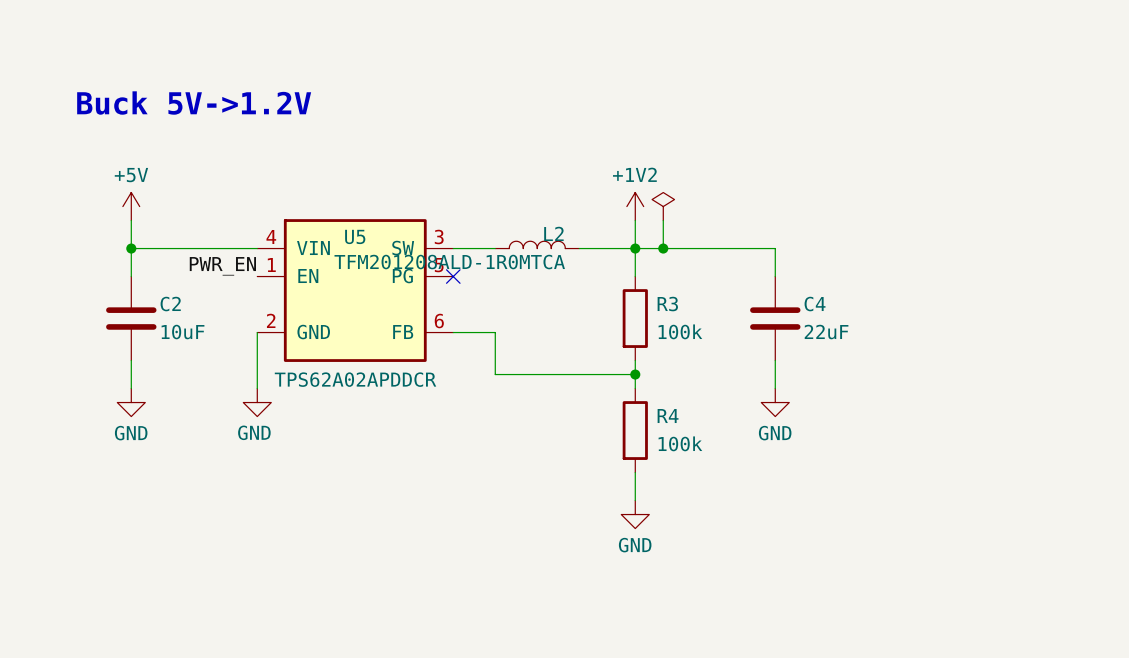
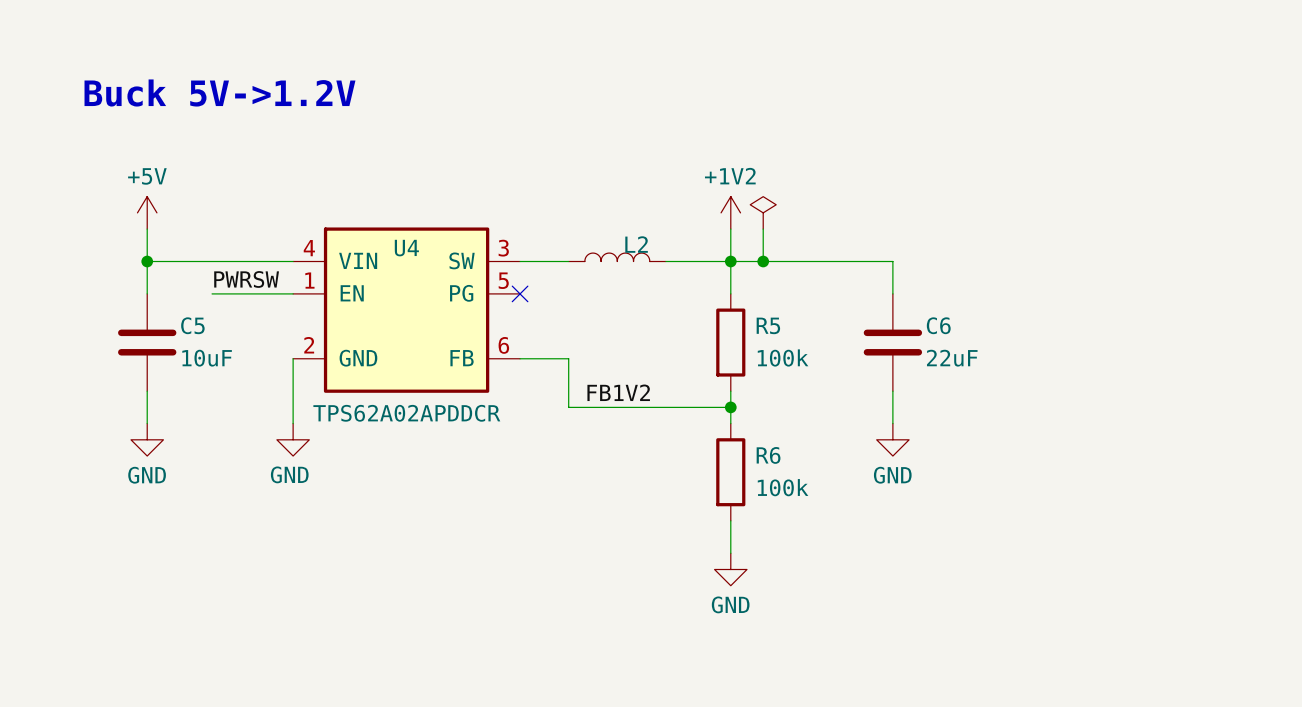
U5 name: U5 (355, 236) -> U4 (406, 248)
L2 value: TFM201208ALD-1R0MTCA (449, 262) -> none
label: none -> PWRSW (246, 279)
label: PWR_EN (222, 266) -> none
wire: none -> (212, 293) (293, 293)
C2 name: C2 (170, 304) -> C5 (192, 325)
R3 name: R3 (667, 304) -> R5 (768, 325)
C4 name: C4 (815, 304) -> C6 (938, 325)
label: none -> FB1V2 (618, 392)
R4 name: R4 (668, 416) -> R6 (768, 455)

